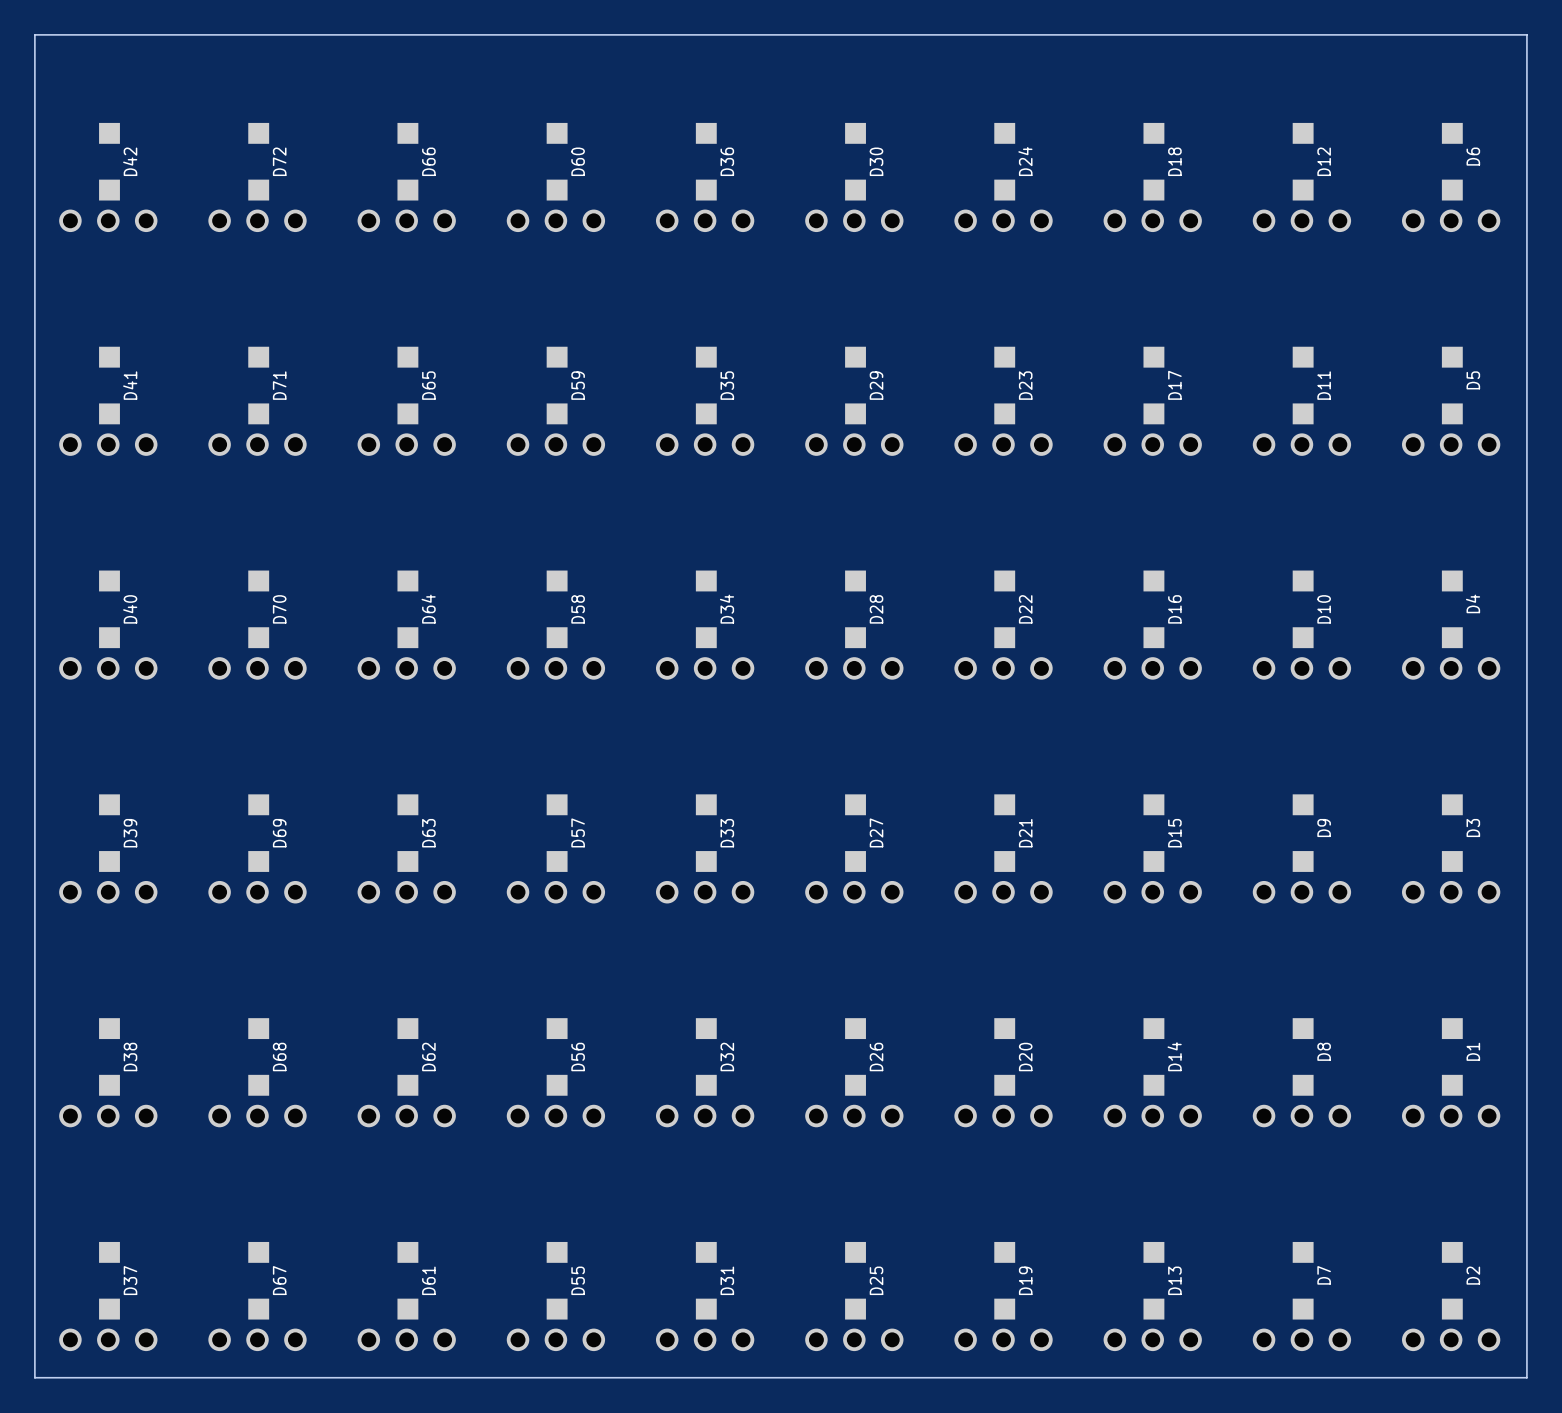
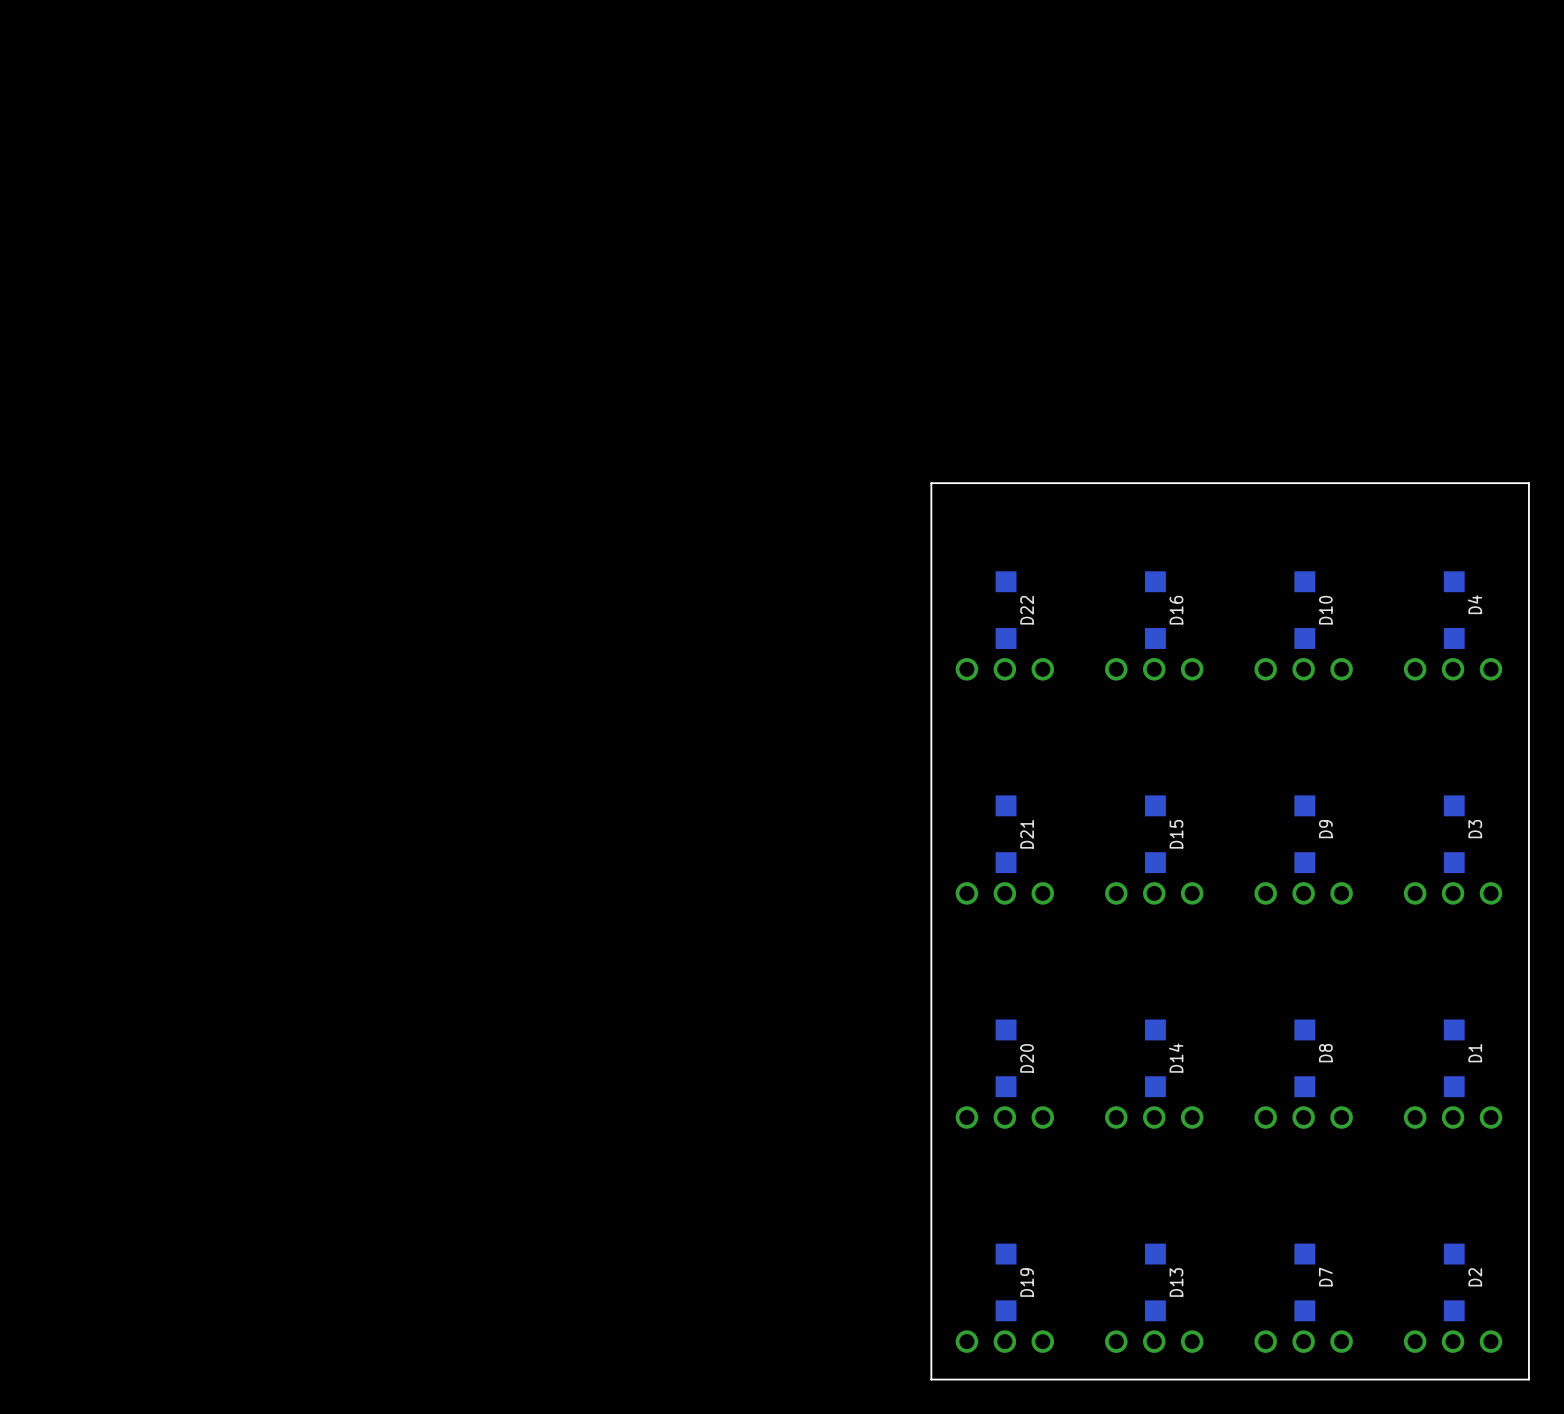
D42: (109, 161) -> none
D72: (258, 161) -> none
D66: (407, 161) -> none
D60: (557, 161) -> none
D36: (706, 161) -> none
D30: (855, 161) -> none
D24: (1004, 161) -> none
D18: (1153, 161) -> none
D12: (1303, 161) -> none
D6: (1452, 161) -> none
part: (70, 220) -> none
part: (108, 220) -> none
part: (146, 220) -> none
part: (219, 220) -> none
part: (257, 220) -> none
part: (295, 220) -> none
part: (368, 220) -> none
part: (406, 220) -> none
part: (444, 220) -> none
part: (518, 220) -> none
part: (555, 220) -> none
part: (593, 220) -> none
part: (667, 220) -> none
part: (705, 220) -> none
part: (743, 220) -> none
part: (816, 220) -> none
part: (854, 220) -> none
part: (892, 220) -> none
part: (965, 220) -> none
part: (1003, 220) -> none
part: (1041, 220) -> none
part: (1114, 220) -> none
part: (1152, 220) -> none
part: (1190, 220) -> none
part: (1264, 220) -> none
part: (1301, 220) -> none
part: (1339, 220) -> none
part: (1413, 220) -> none
part: (1451, 220) -> none
part: (1489, 220) -> none
D41: (109, 385) -> none
D71: (258, 385) -> none
D65: (407, 385) -> none
D59: (557, 385) -> none
D35: (706, 385) -> none
D29: (855, 385) -> none
D23: (1004, 385) -> none
D17: (1153, 385) -> none
D11: (1303, 385) -> none
D5: (1452, 385) -> none
part: (70, 444) -> none
part: (108, 444) -> none
part: (146, 444) -> none
part: (219, 444) -> none
part: (257, 444) -> none
part: (295, 444) -> none
part: (368, 444) -> none
part: (406, 444) -> none
part: (444, 444) -> none
part: (518, 444) -> none
part: (555, 444) -> none
part: (593, 444) -> none
part: (667, 444) -> none
part: (705, 444) -> none
part: (743, 444) -> none
part: (816, 444) -> none
part: (854, 444) -> none
part: (892, 444) -> none
part: (965, 444) -> none
part: (1003, 444) -> none
part: (1041, 444) -> none
part: (1114, 444) -> none
part: (1152, 444) -> none
part: (1190, 444) -> none
part: (1264, 444) -> none
part: (1301, 444) -> none
part: (1339, 444) -> none
part: (1413, 444) -> none
part: (1451, 444) -> none
part: (1489, 444) -> none
board edge: (1526, 482) (1526, 34) (34, 34) (34, 1377) (930, 1377) -> (1528, 483) (931, 483) (931, 1379)
D40: (109, 609) -> none
D70: (258, 609) -> none
D64: (407, 609) -> none
D58: (557, 609) -> none
D34: (706, 609) -> none
D28: (855, 609) -> none
part: (70, 668) -> none
part: (108, 668) -> none
part: (146, 668) -> none
part: (219, 668) -> none
part: (257, 668) -> none
part: (295, 668) -> none
part: (368, 668) -> none
part: (406, 668) -> none
part: (444, 668) -> none
part: (518, 668) -> none
part: (555, 668) -> none
part: (593, 668) -> none
part: (667, 668) -> none
part: (705, 668) -> none
part: (743, 668) -> none
part: (816, 668) -> none
part: (854, 668) -> none
part: (892, 668) -> none
D39: (109, 833) -> none
D69: (258, 833) -> none
D63: (407, 833) -> none
D57: (557, 833) -> none
D33: (706, 833) -> none
D27: (855, 833) -> none
part: (70, 892) -> none
part: (108, 892) -> none
part: (146, 892) -> none
part: (219, 892) -> none
part: (257, 892) -> none
part: (295, 892) -> none
part: (368, 892) -> none
part: (406, 892) -> none
part: (444, 892) -> none
part: (518, 892) -> none
part: (555, 892) -> none
part: (593, 892) -> none
part: (667, 892) -> none
part: (705, 892) -> none
part: (743, 892) -> none
part: (816, 892) -> none
part: (854, 892) -> none
part: (892, 892) -> none
D38: (109, 1056) -> none
D68: (258, 1056) -> none
D62: (407, 1056) -> none
D56: (557, 1056) -> none
D32: (706, 1056) -> none
D26: (855, 1056) -> none
part: (70, 1116) -> none
part: (108, 1116) -> none
part: (146, 1116) -> none
part: (219, 1116) -> none
part: (257, 1116) -> none
part: (295, 1116) -> none
part: (368, 1116) -> none
part: (406, 1116) -> none
part: (444, 1116) -> none
part: (518, 1116) -> none
part: (555, 1116) -> none
part: (593, 1116) -> none
part: (667, 1116) -> none
part: (705, 1116) -> none
part: (743, 1116) -> none
part: (816, 1116) -> none
part: (854, 1116) -> none
part: (892, 1116) -> none
D37: (109, 1280) -> none
D67: (258, 1280) -> none
D61: (407, 1280) -> none
D55: (557, 1280) -> none
D31: (706, 1280) -> none
D25: (855, 1280) -> none
part: (70, 1339) -> none
part: (108, 1339) -> none
part: (146, 1339) -> none
part: (219, 1339) -> none
part: (257, 1339) -> none
part: (295, 1339) -> none
part: (368, 1339) -> none
part: (406, 1339) -> none
part: (444, 1339) -> none
part: (518, 1339) -> none
part: (555, 1339) -> none
part: (593, 1339) -> none
part: (667, 1339) -> none
part: (705, 1339) -> none
part: (743, 1339) -> none
part: (816, 1339) -> none
part: (854, 1339) -> none
part: (892, 1339) -> none

